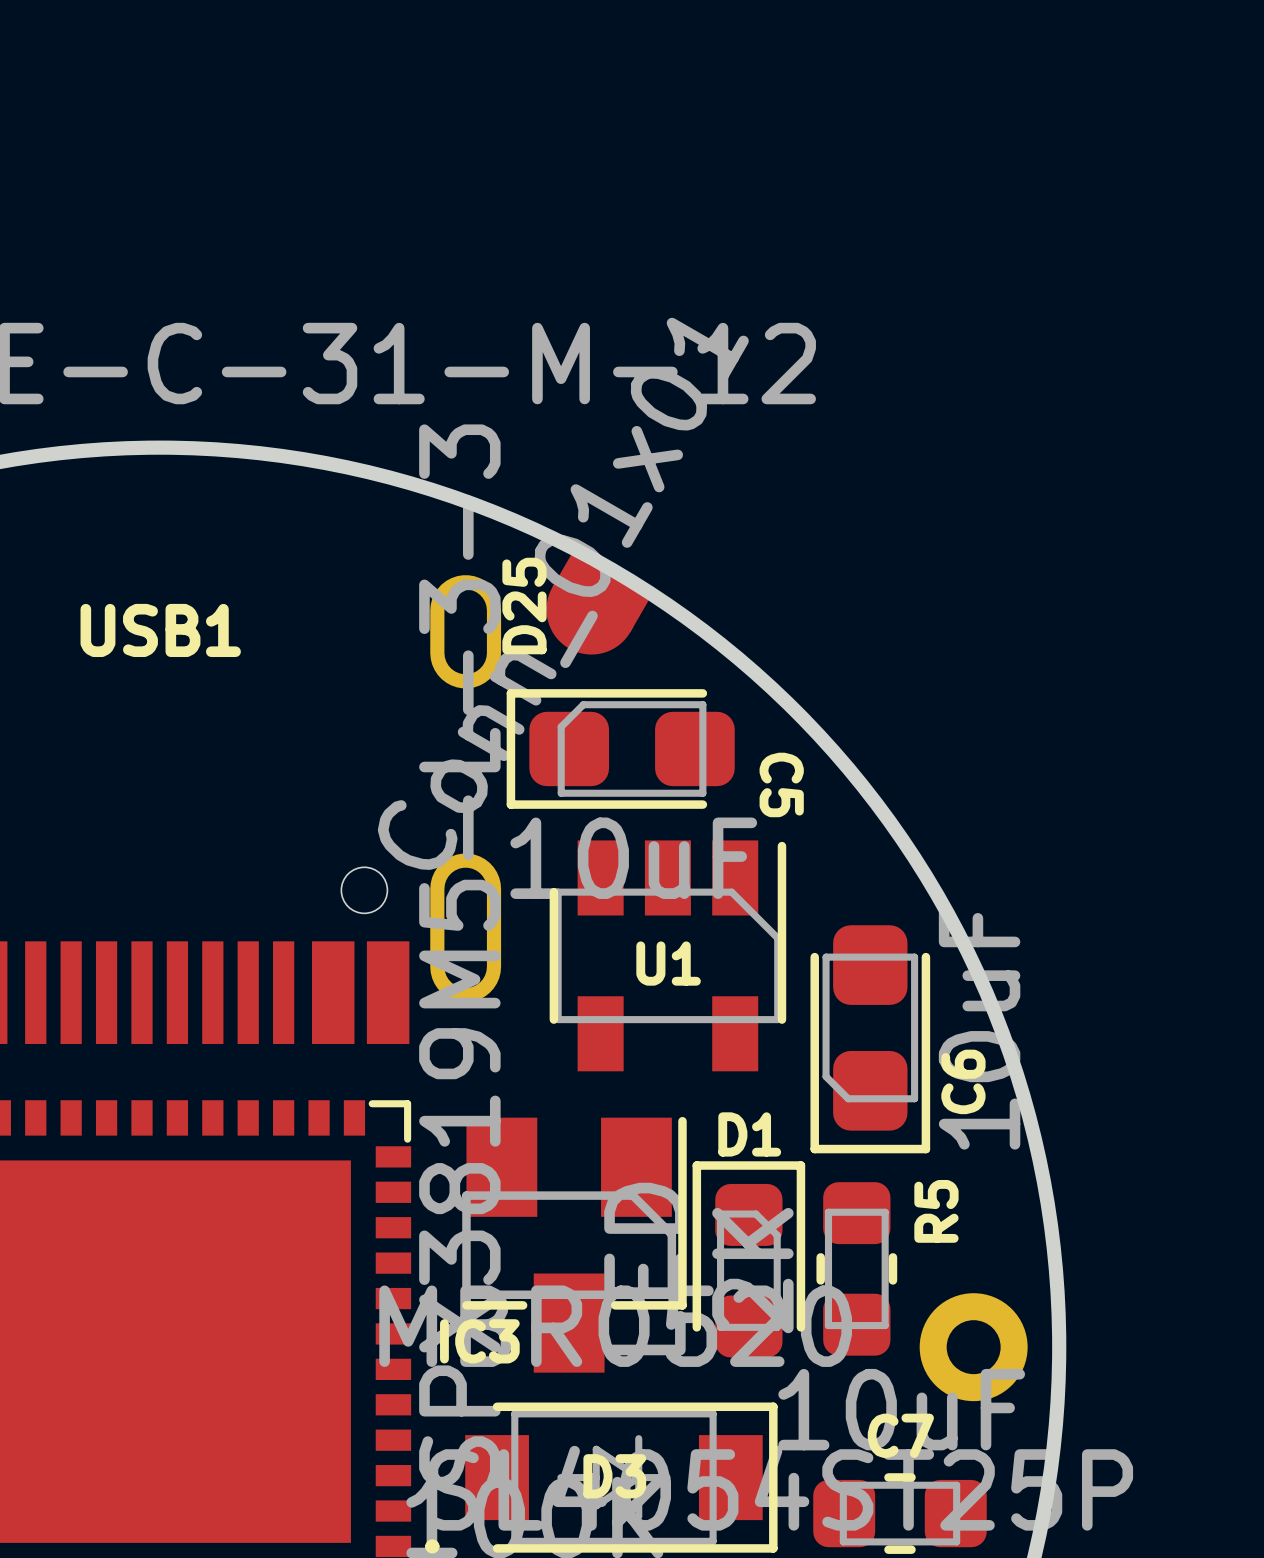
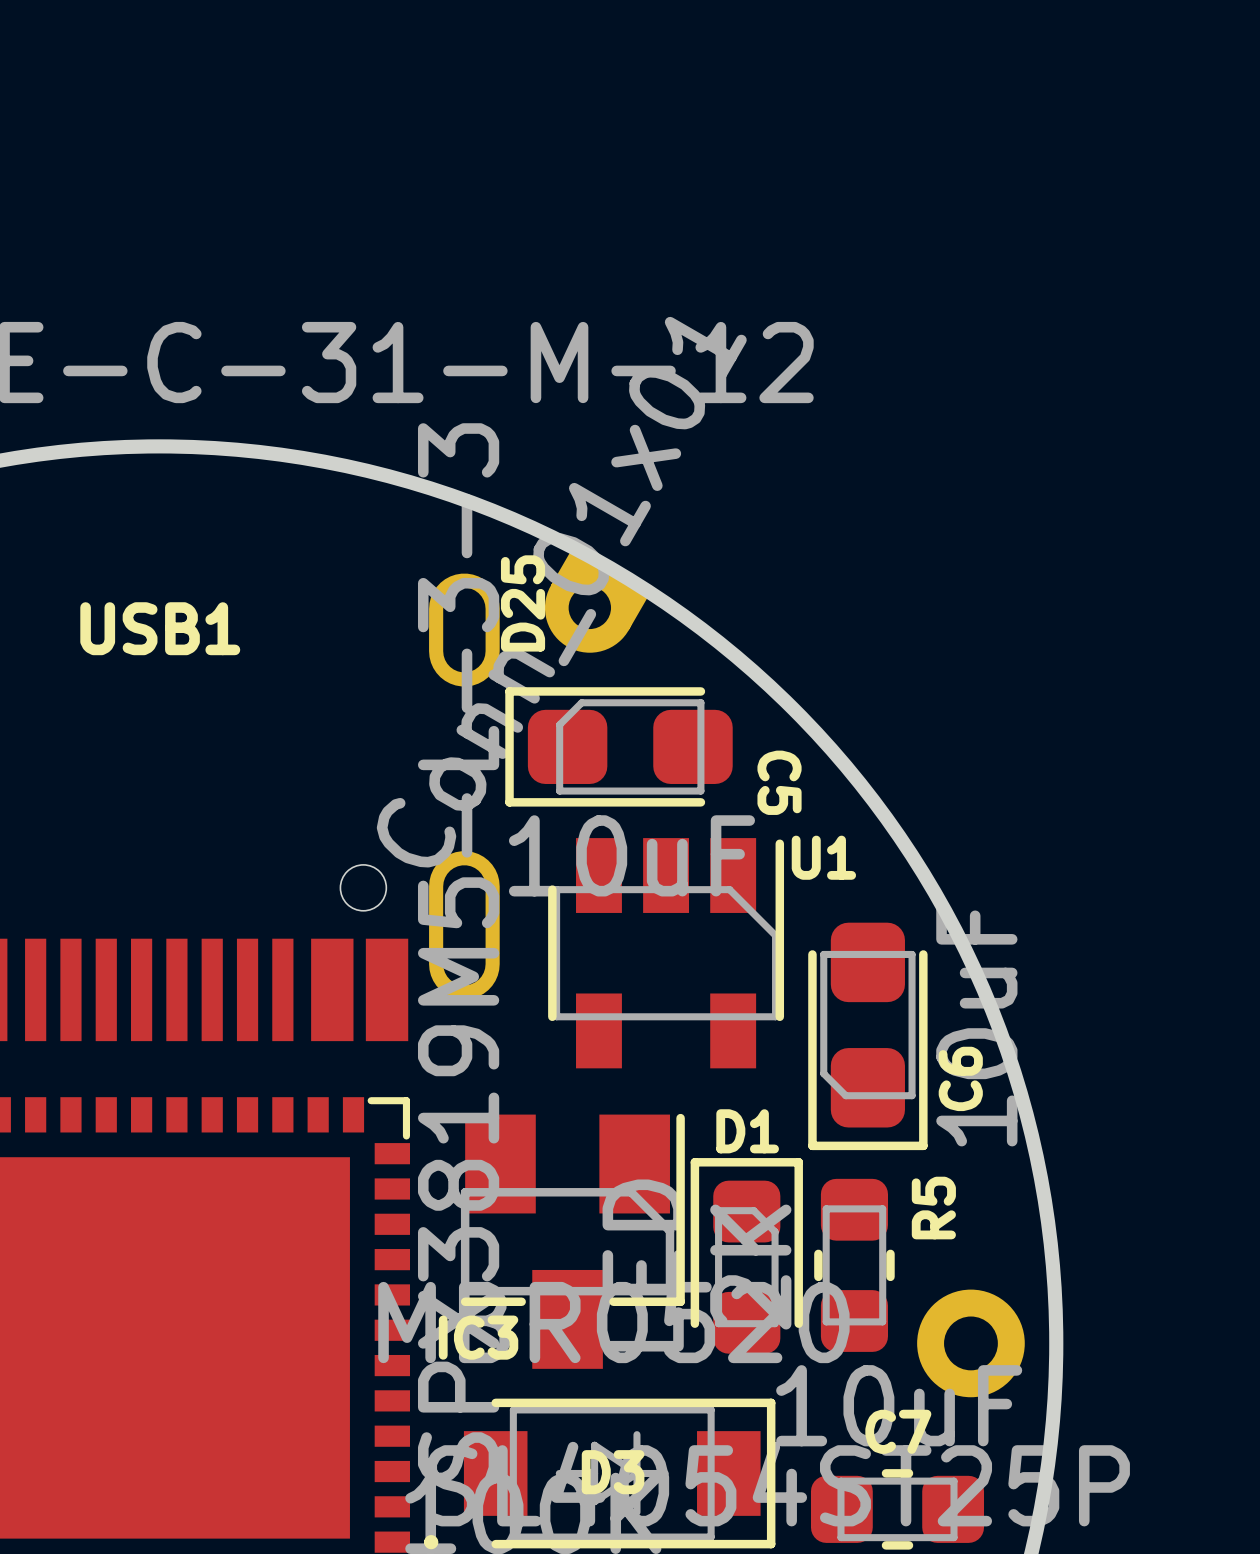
D25 footprint: [546, 548, 653, 655] -> [544, 546, 652, 653]
U1 name position: U1 (668, 963) -> U1 (823, 857)

